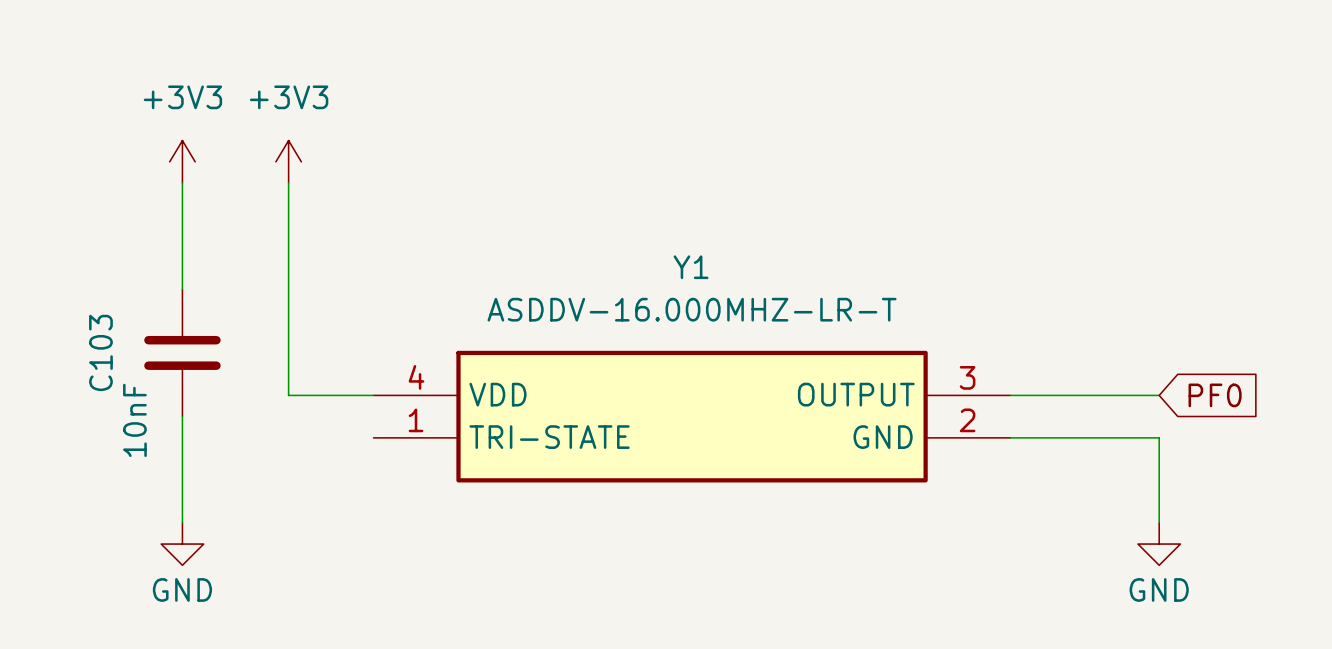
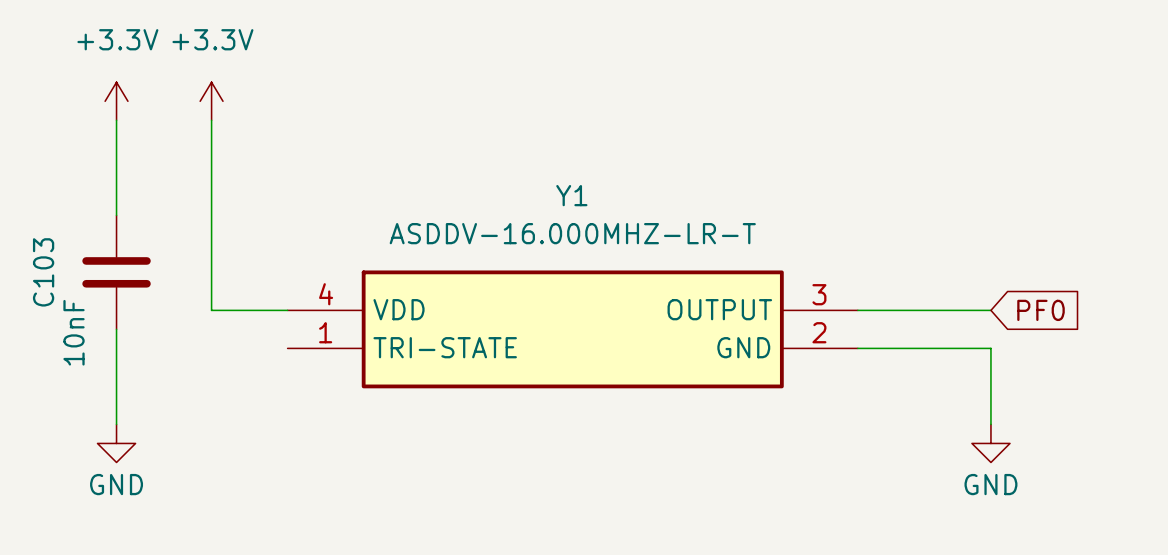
power symbol: +3V3 (182, 161) -> +3.3V (116, 101)
power symbol: +3V3 (288, 161) -> +3.3V (211, 101)

